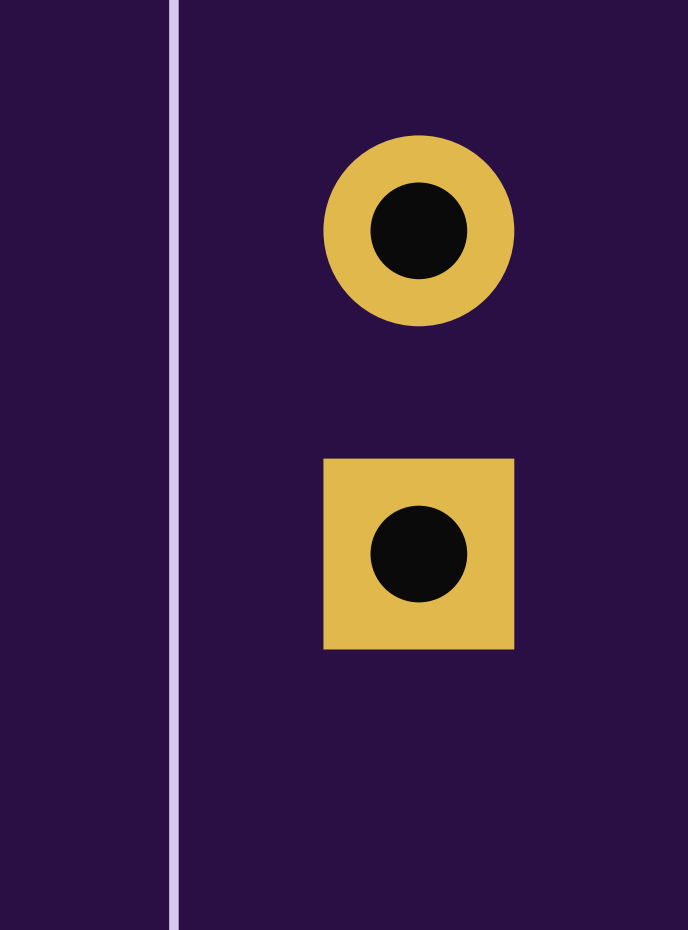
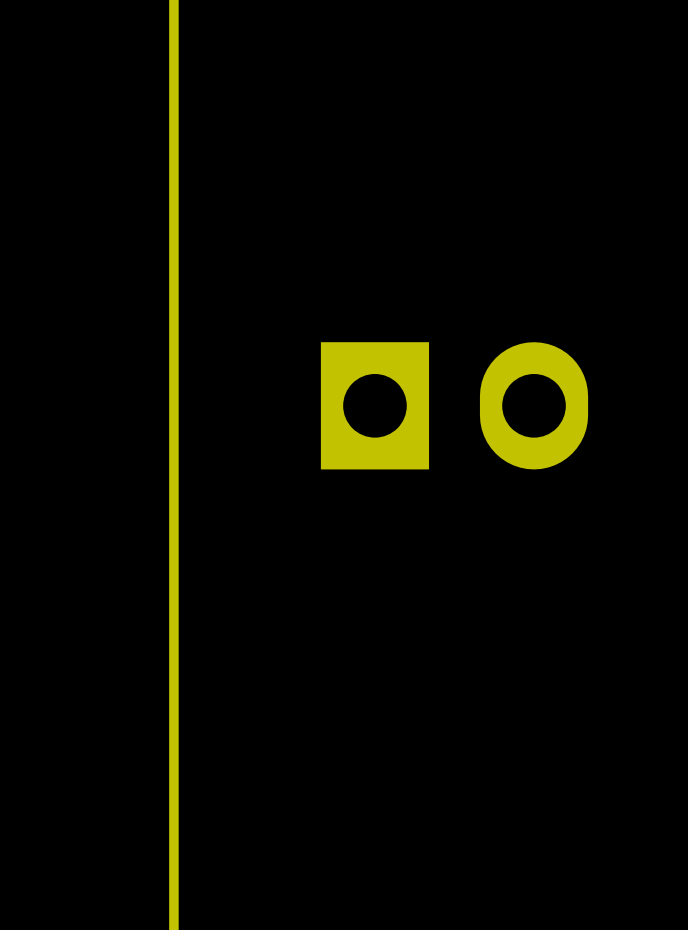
part footprint: [323, 135, 515, 650] -> [320, 342, 589, 470]

